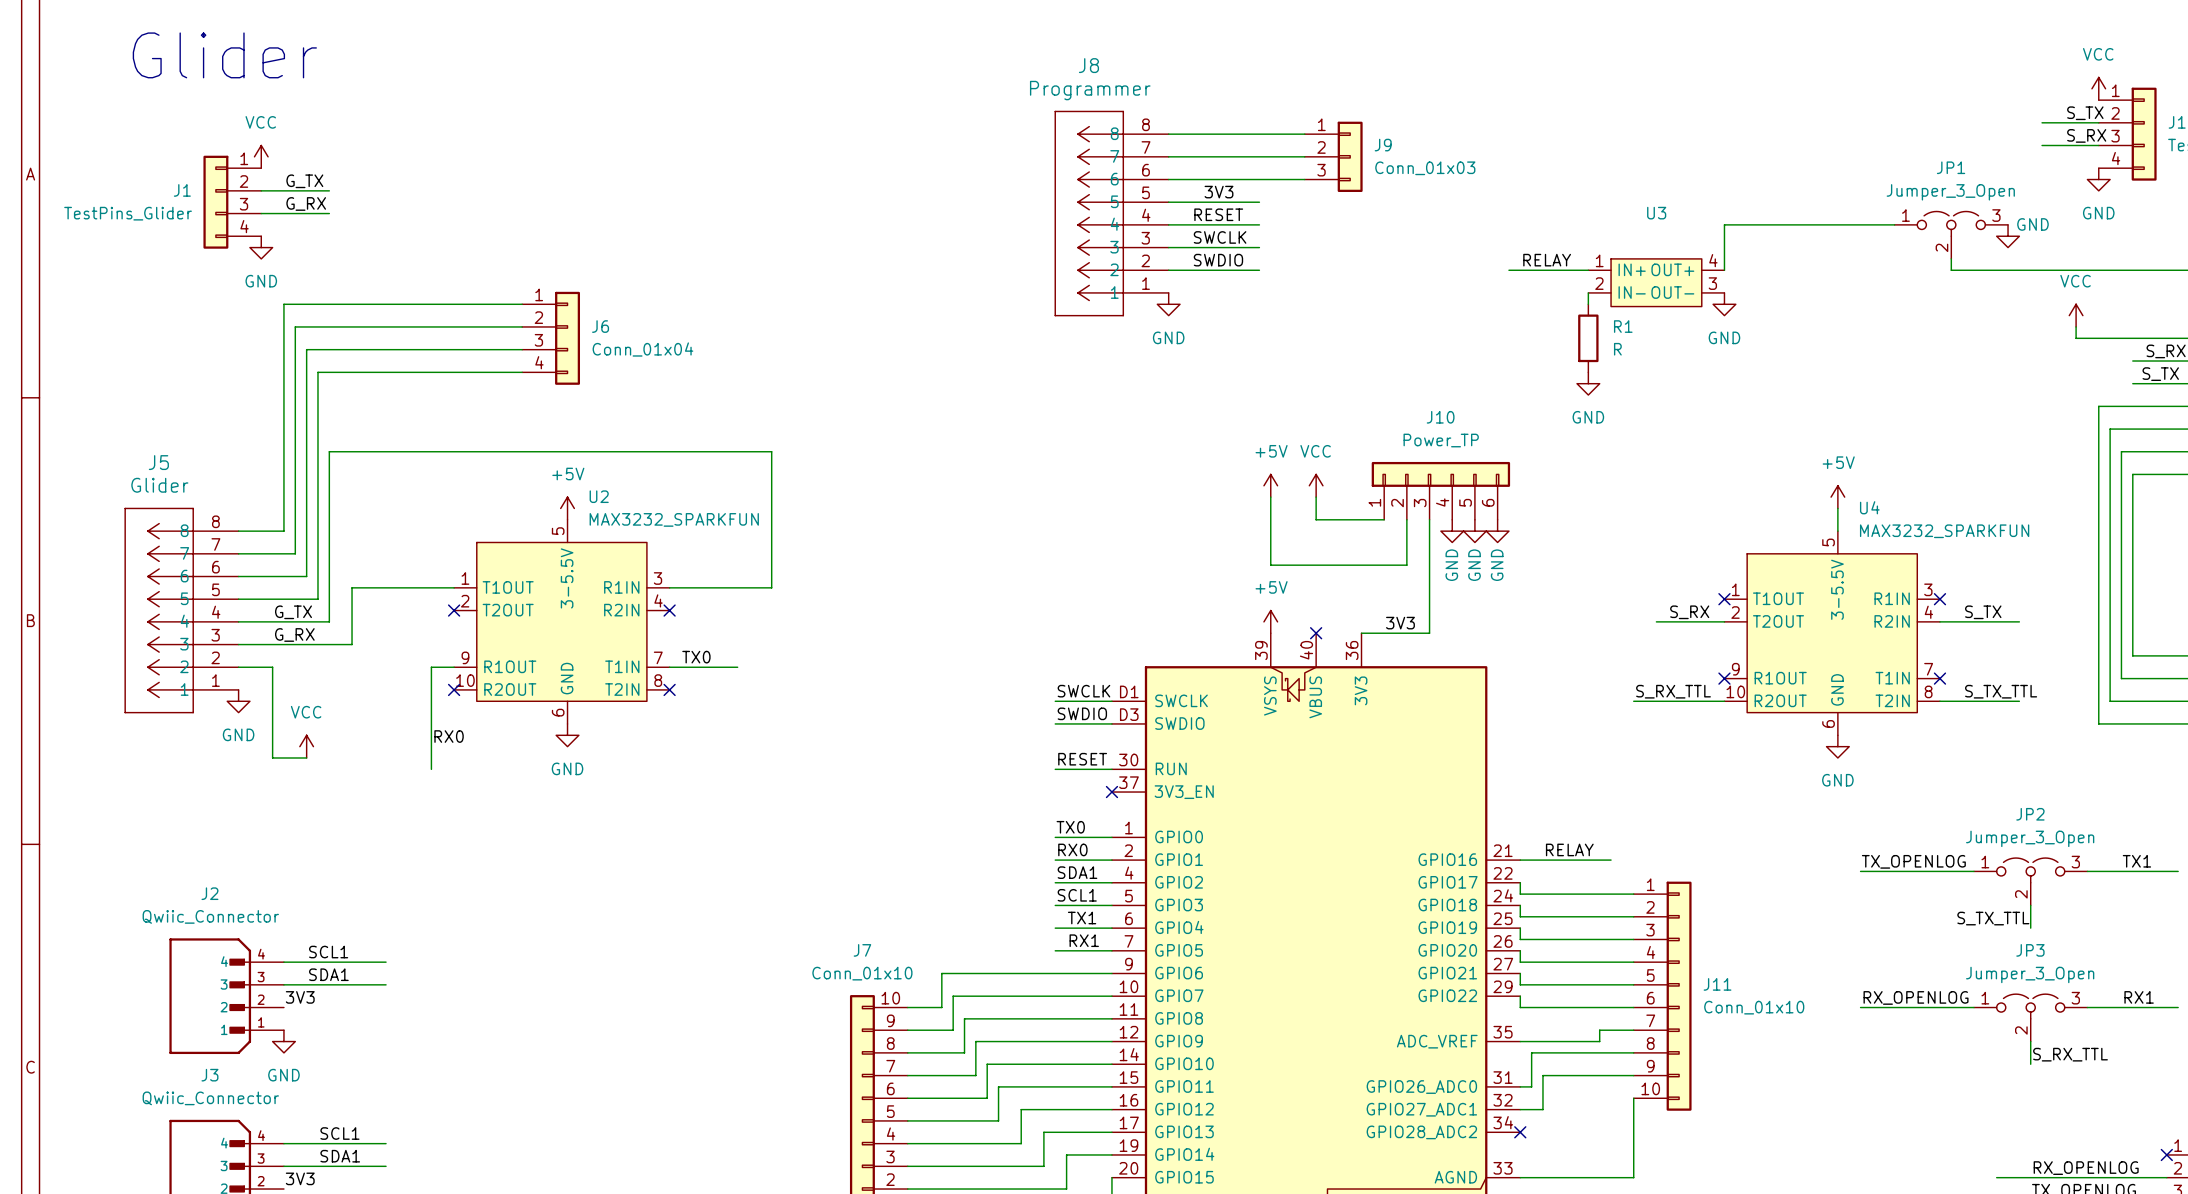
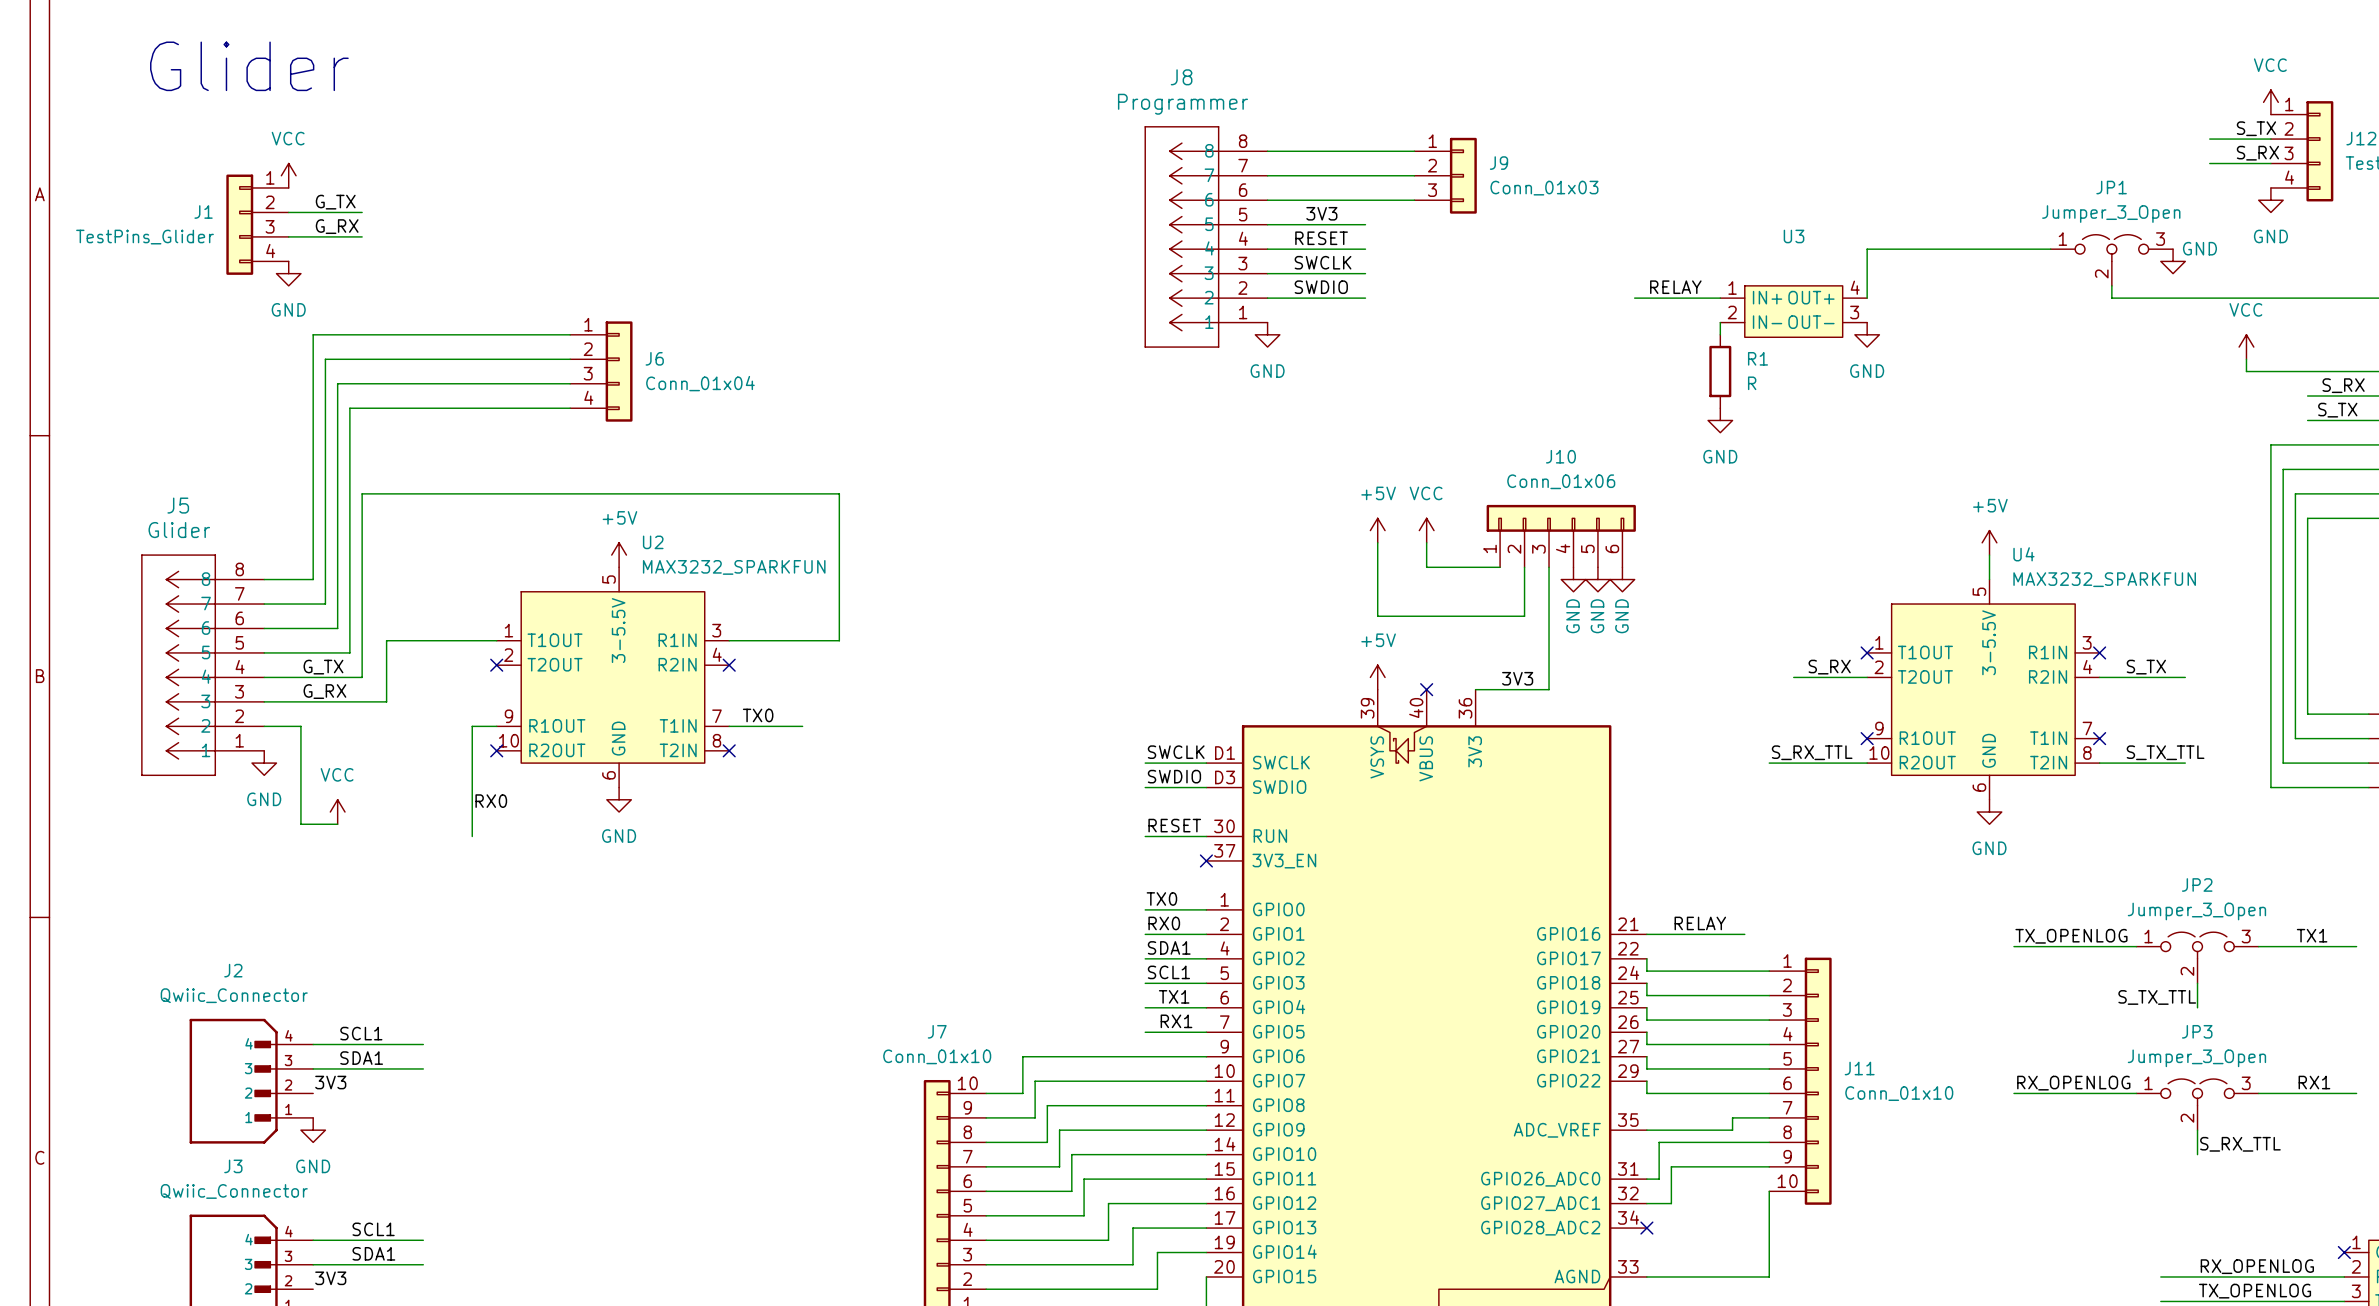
J10 value: Power_TP (1441, 440) -> Conn_01x06 (1561, 481)

